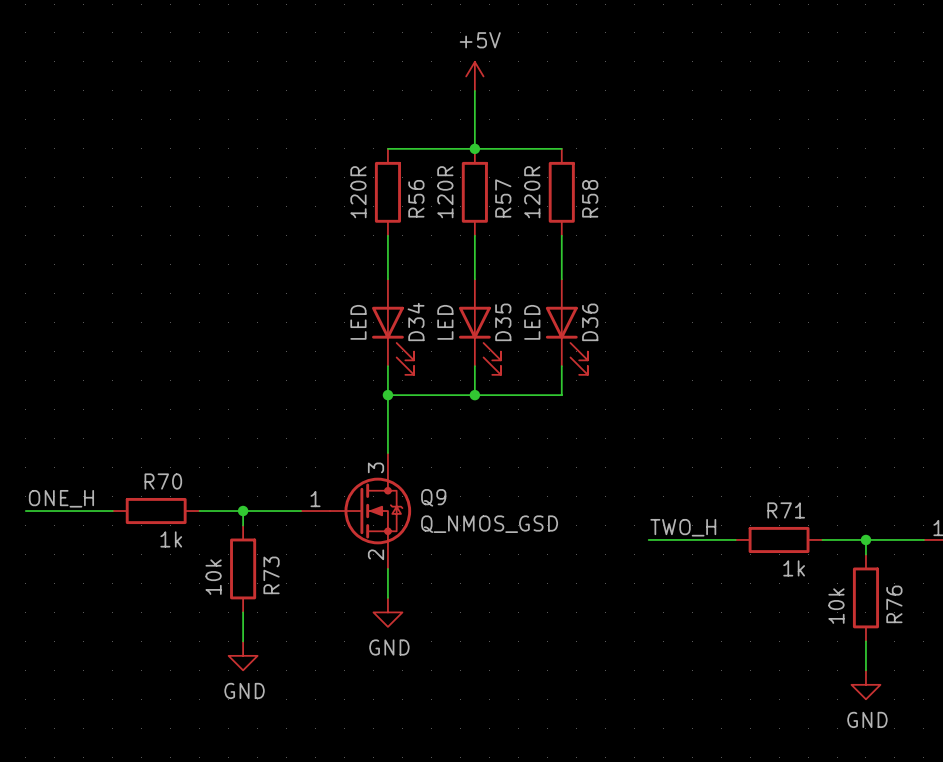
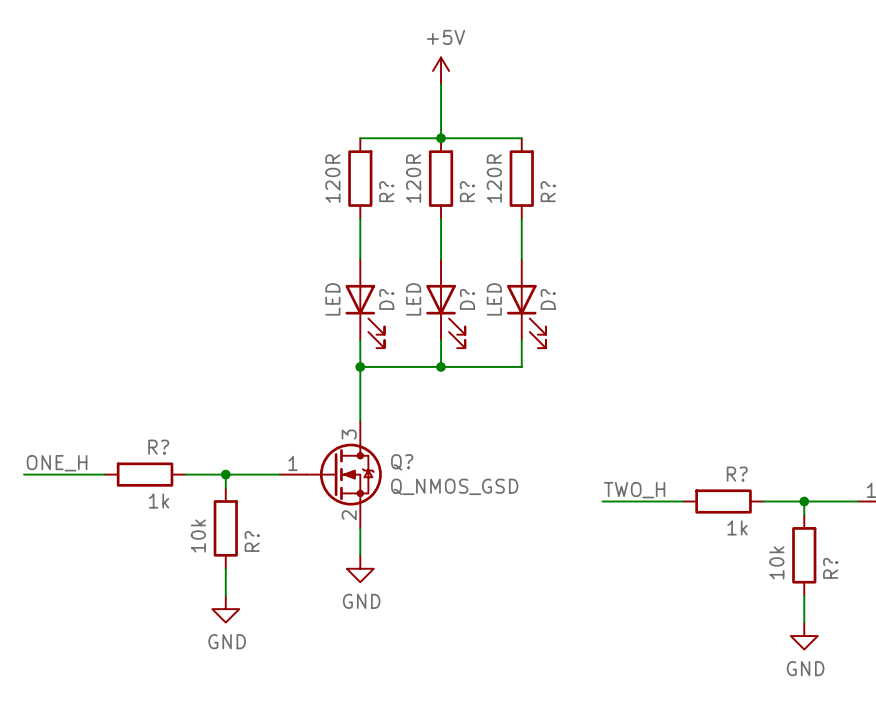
R56 name: R56 (416, 198) -> R? (386, 191)
R57 name: R57 (503, 198) -> R? (467, 191)
R58 name: R58 (590, 198) -> R? (548, 191)
D34 name: D34 (416, 322) -> D? (386, 299)
D35 name: D35 (503, 322) -> D? (467, 299)
D36 name: D36 (590, 322) -> D? (548, 299)
R70 name: R70 (163, 481) -> R? (158, 447)
Q9 name: Q9 (433, 497) -> Q? (402, 462)
R71 name: R71 (786, 510) -> R? (737, 474)
R73 name: R73 (271, 575) -> R? (252, 541)
R76 name: R76 (894, 604) -> R? (830, 568)

